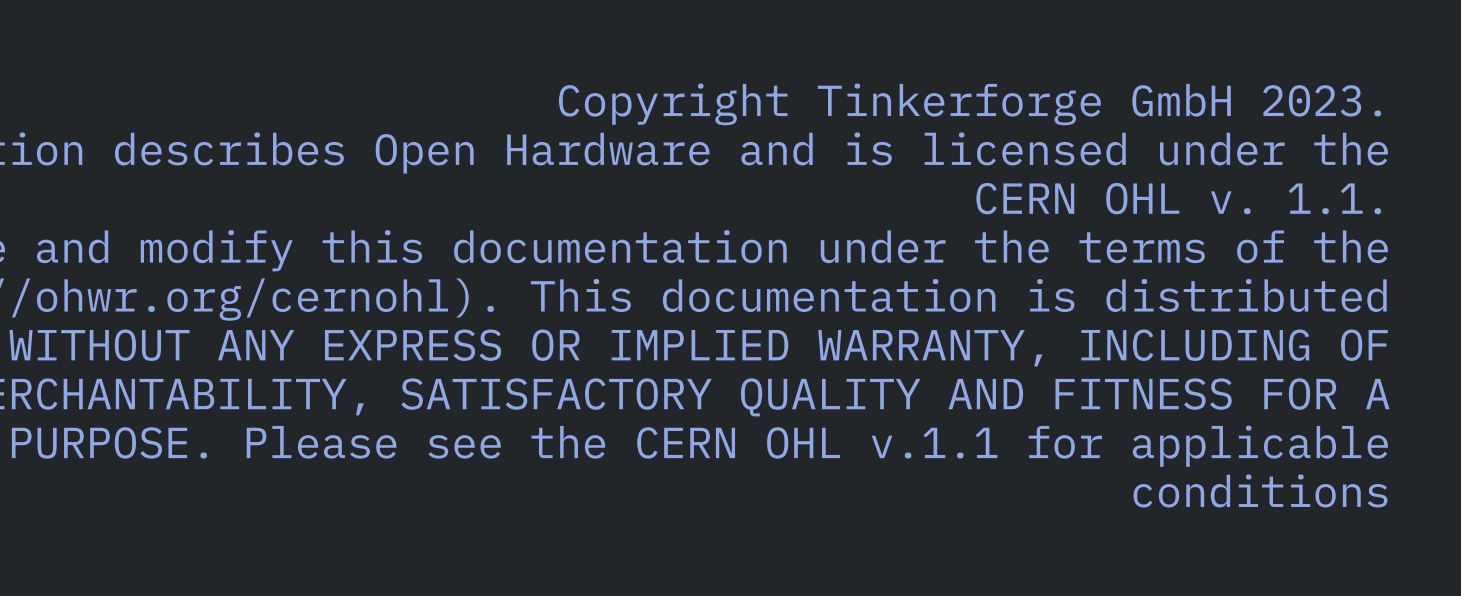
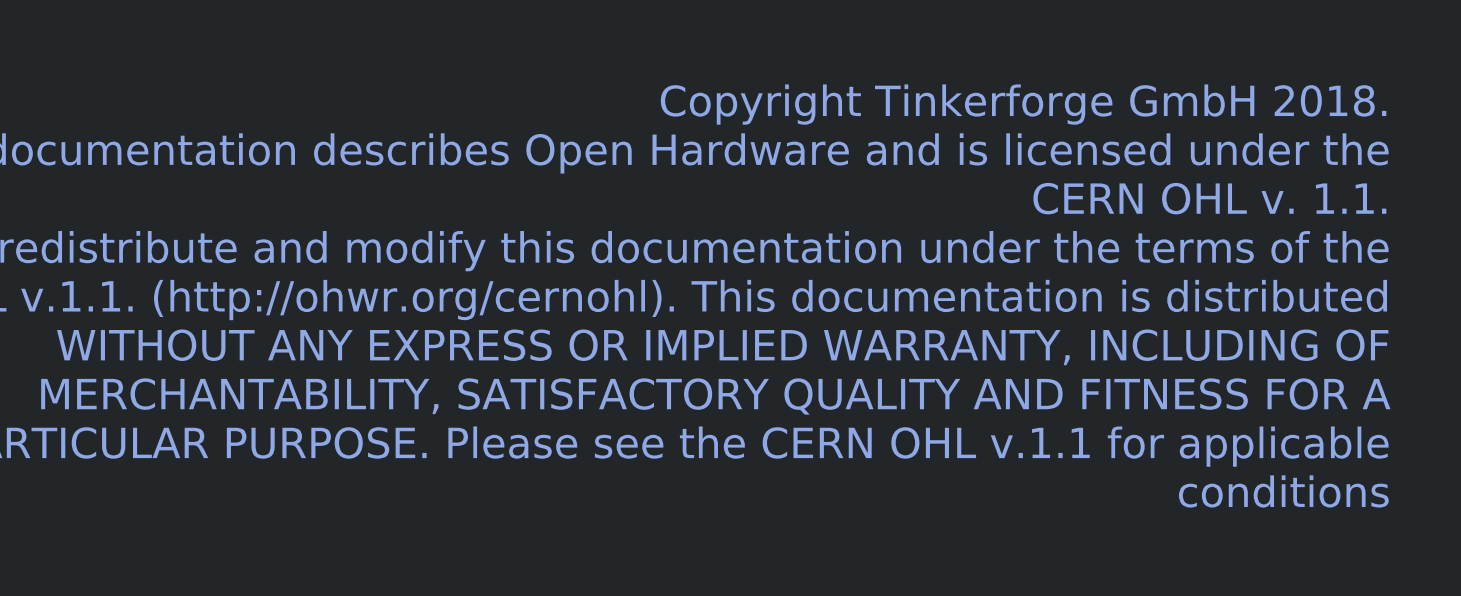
text: Copyright Tinkerforge GmbH 2023. (969, 104) -> Copyright Tinkerforge GmbH 2018. (1023, 104)

